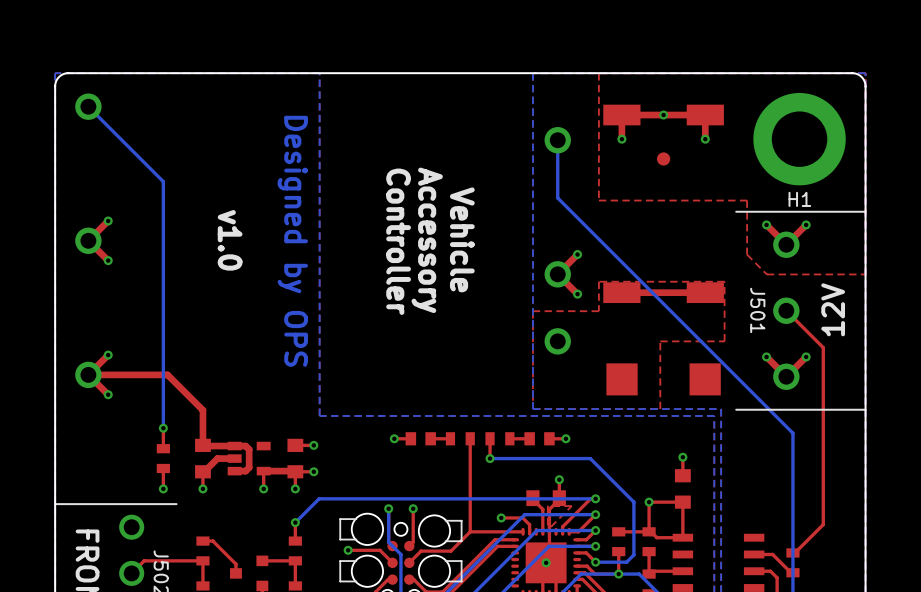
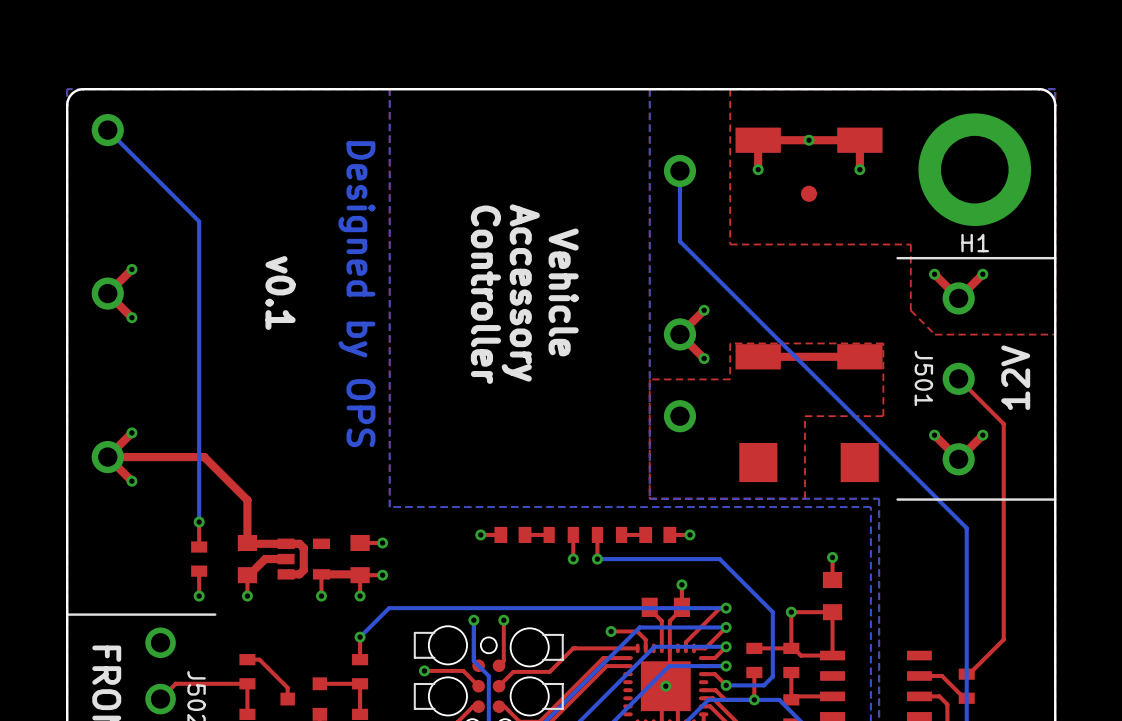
text: v1.0 (230, 240) -> v0.1 (280, 292)
top track: (470, 458) (470, 531) -> none
via: none -> (573, 559)
top zone outline: (571, 506) (551, 526) (547, 526) (547, 506) (571, 506) -> none

